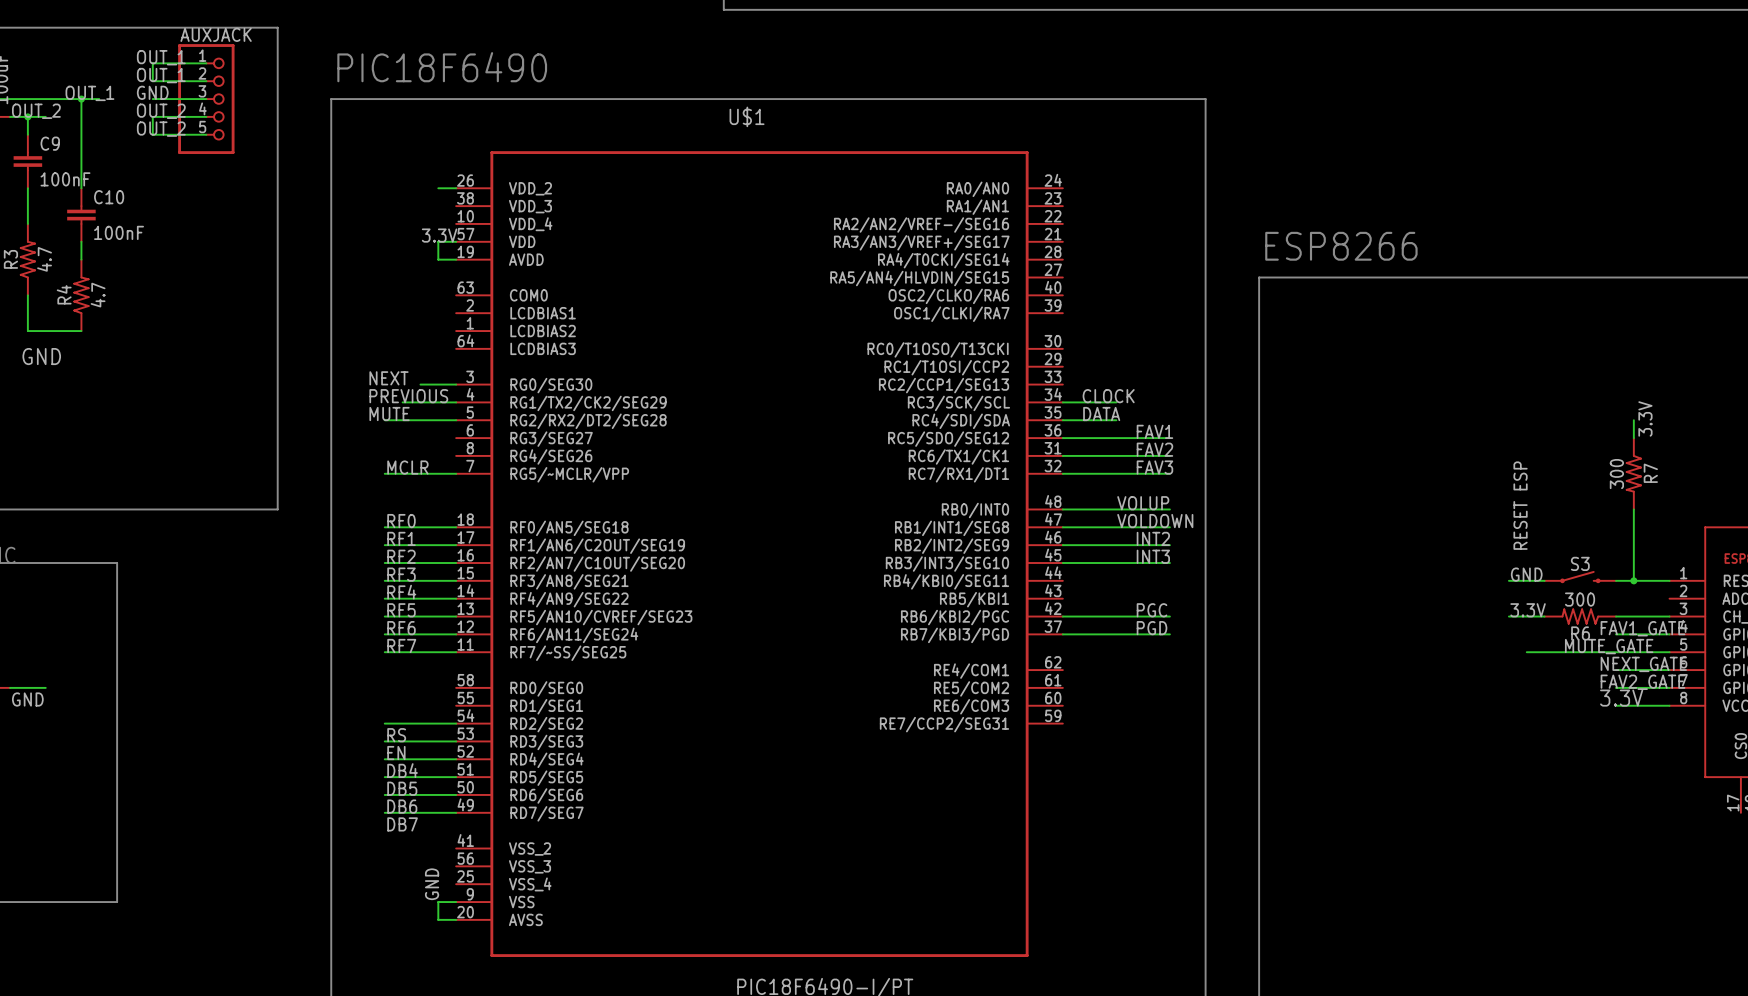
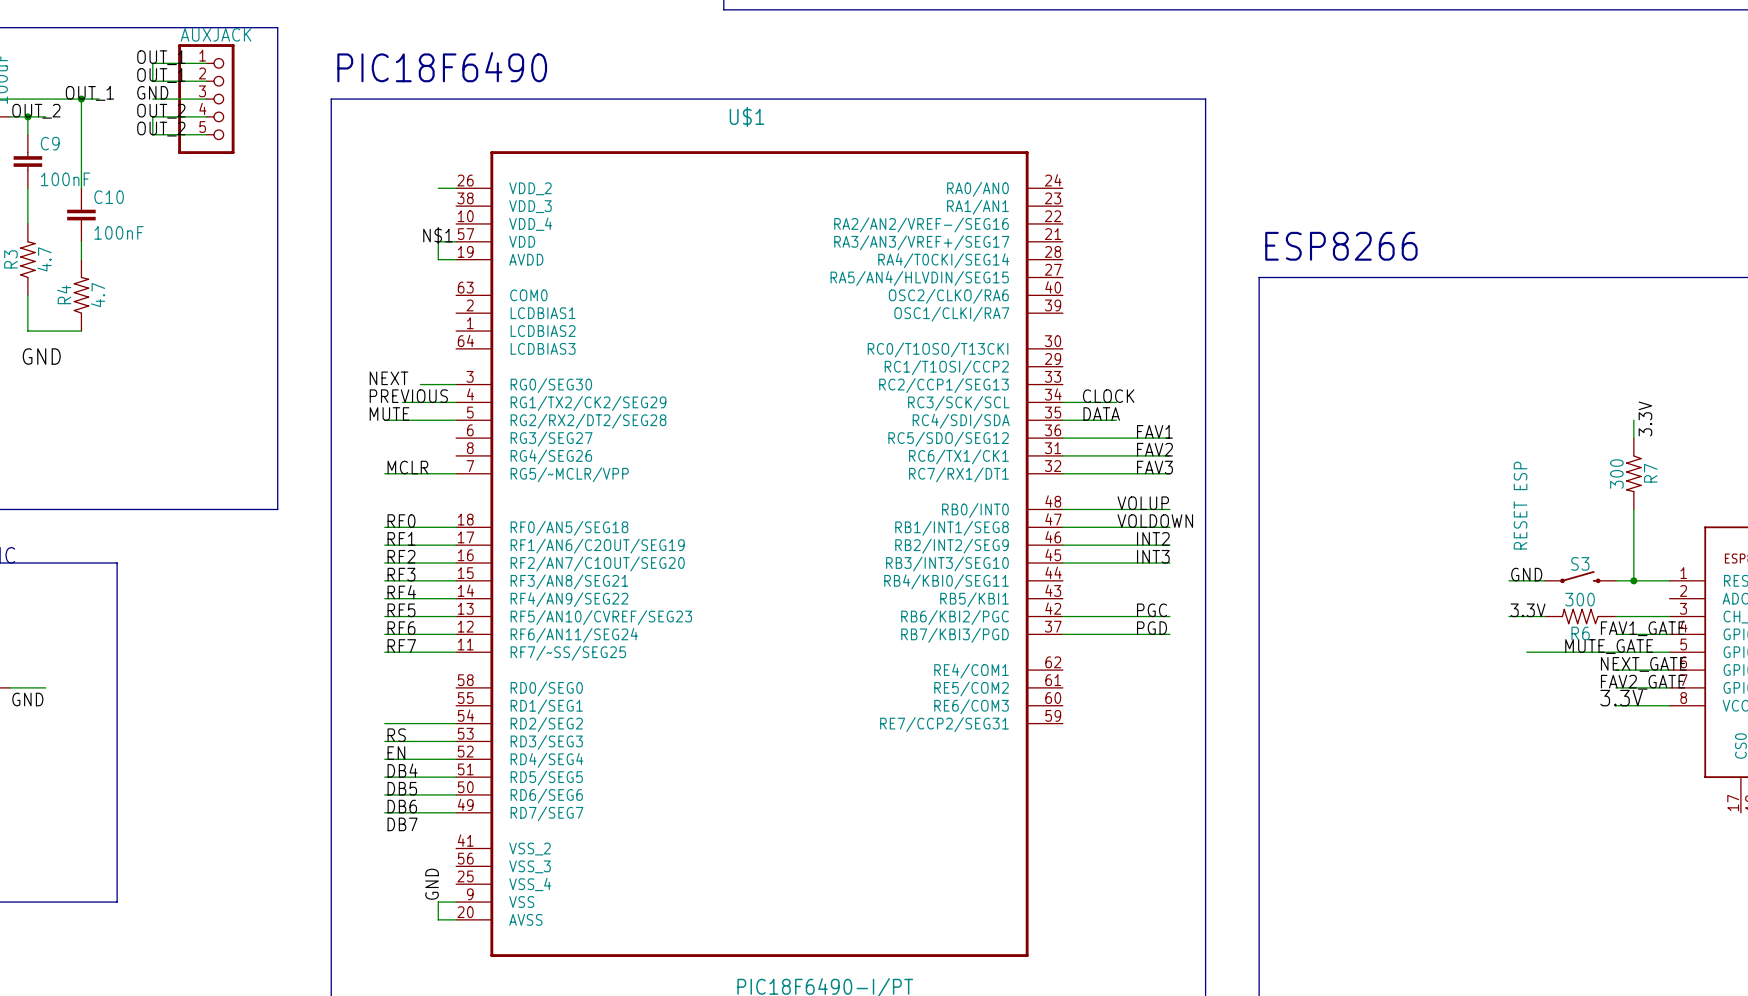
label: 3.3V (439, 235) -> N$1 (437, 235)

